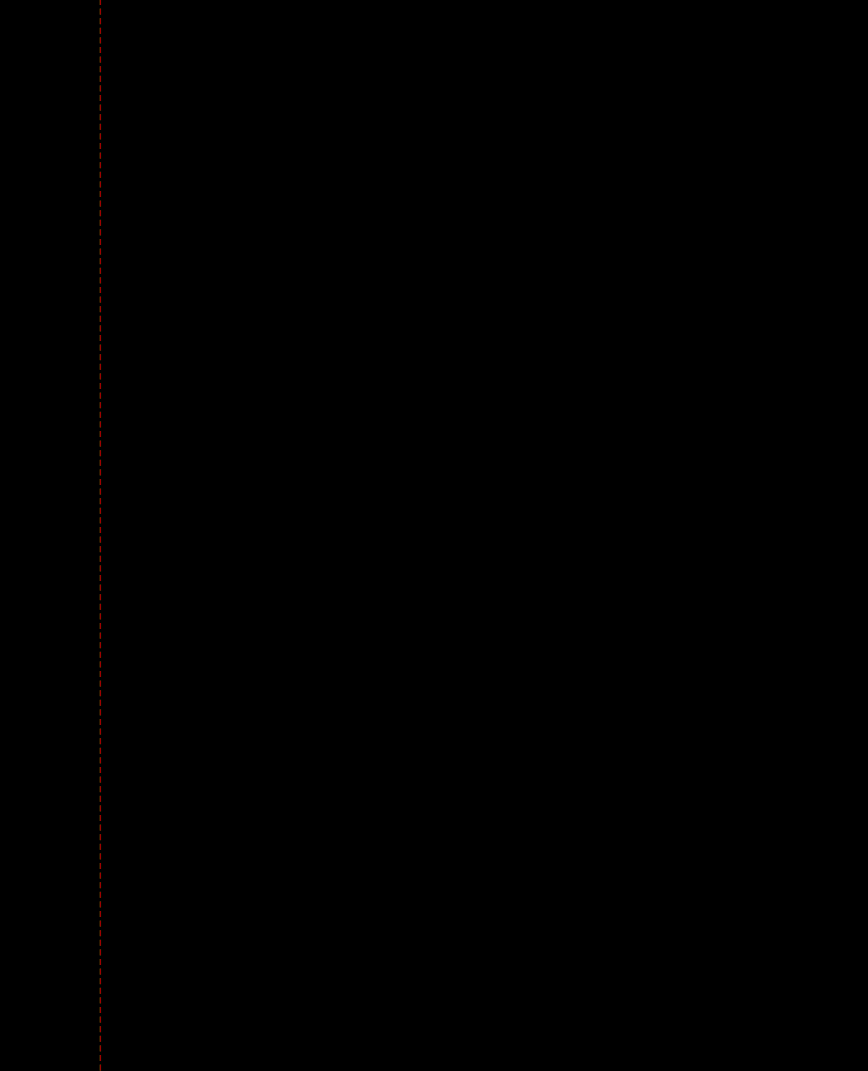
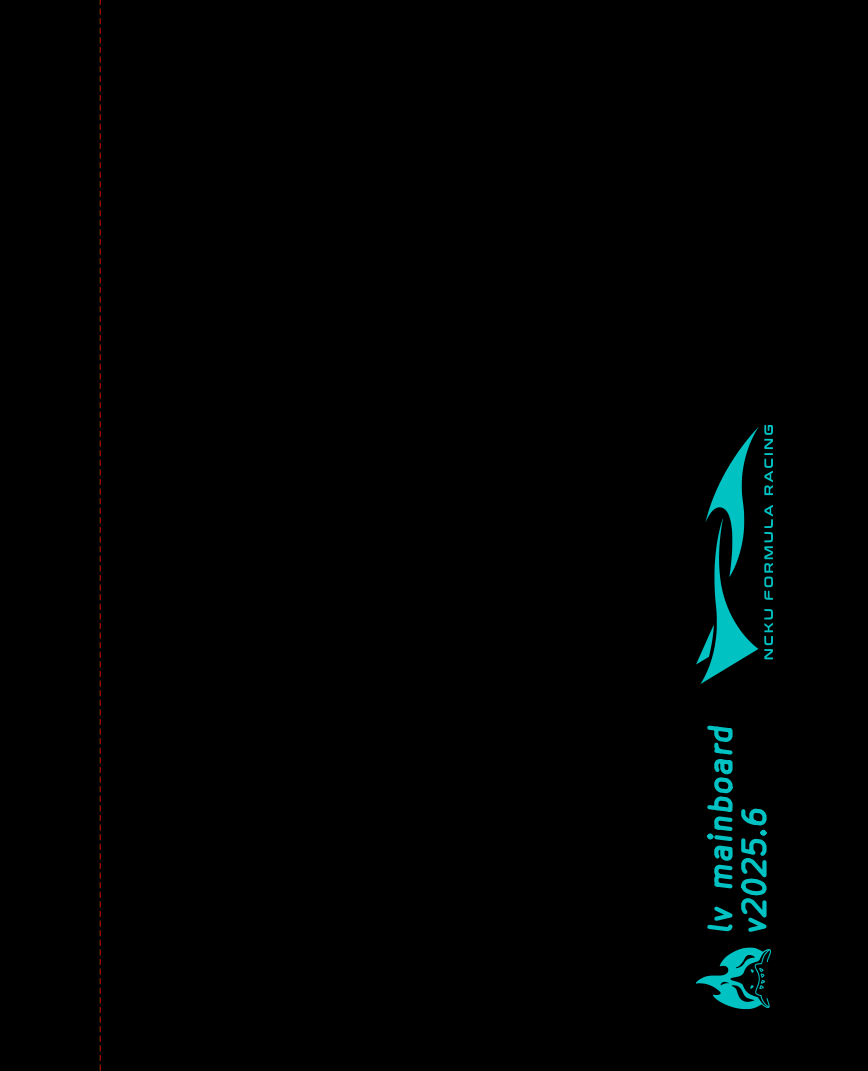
drawing: none -> [696, 424, 774, 685]
text: none -> lv mainboard (719, 828)
text: none -> v2025.6 (753, 870)
drawing: none -> [695, 947, 771, 1010]

